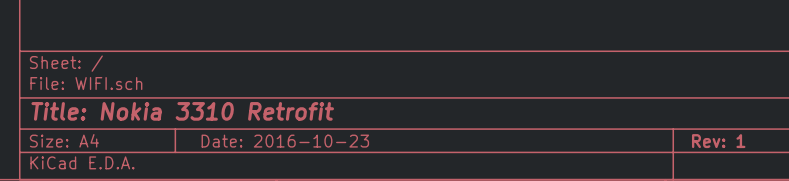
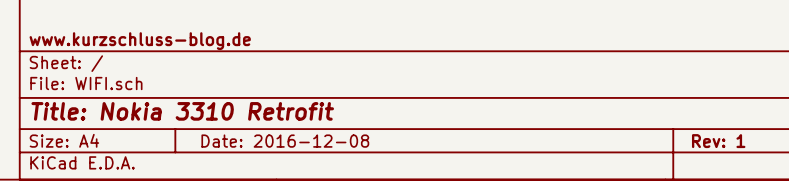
title block: none -> www.kurzschluss-blog.de (140, 41)
title block: Date: 2016-10-23 (285, 141) -> Date: 2016-12-08 (285, 141)

